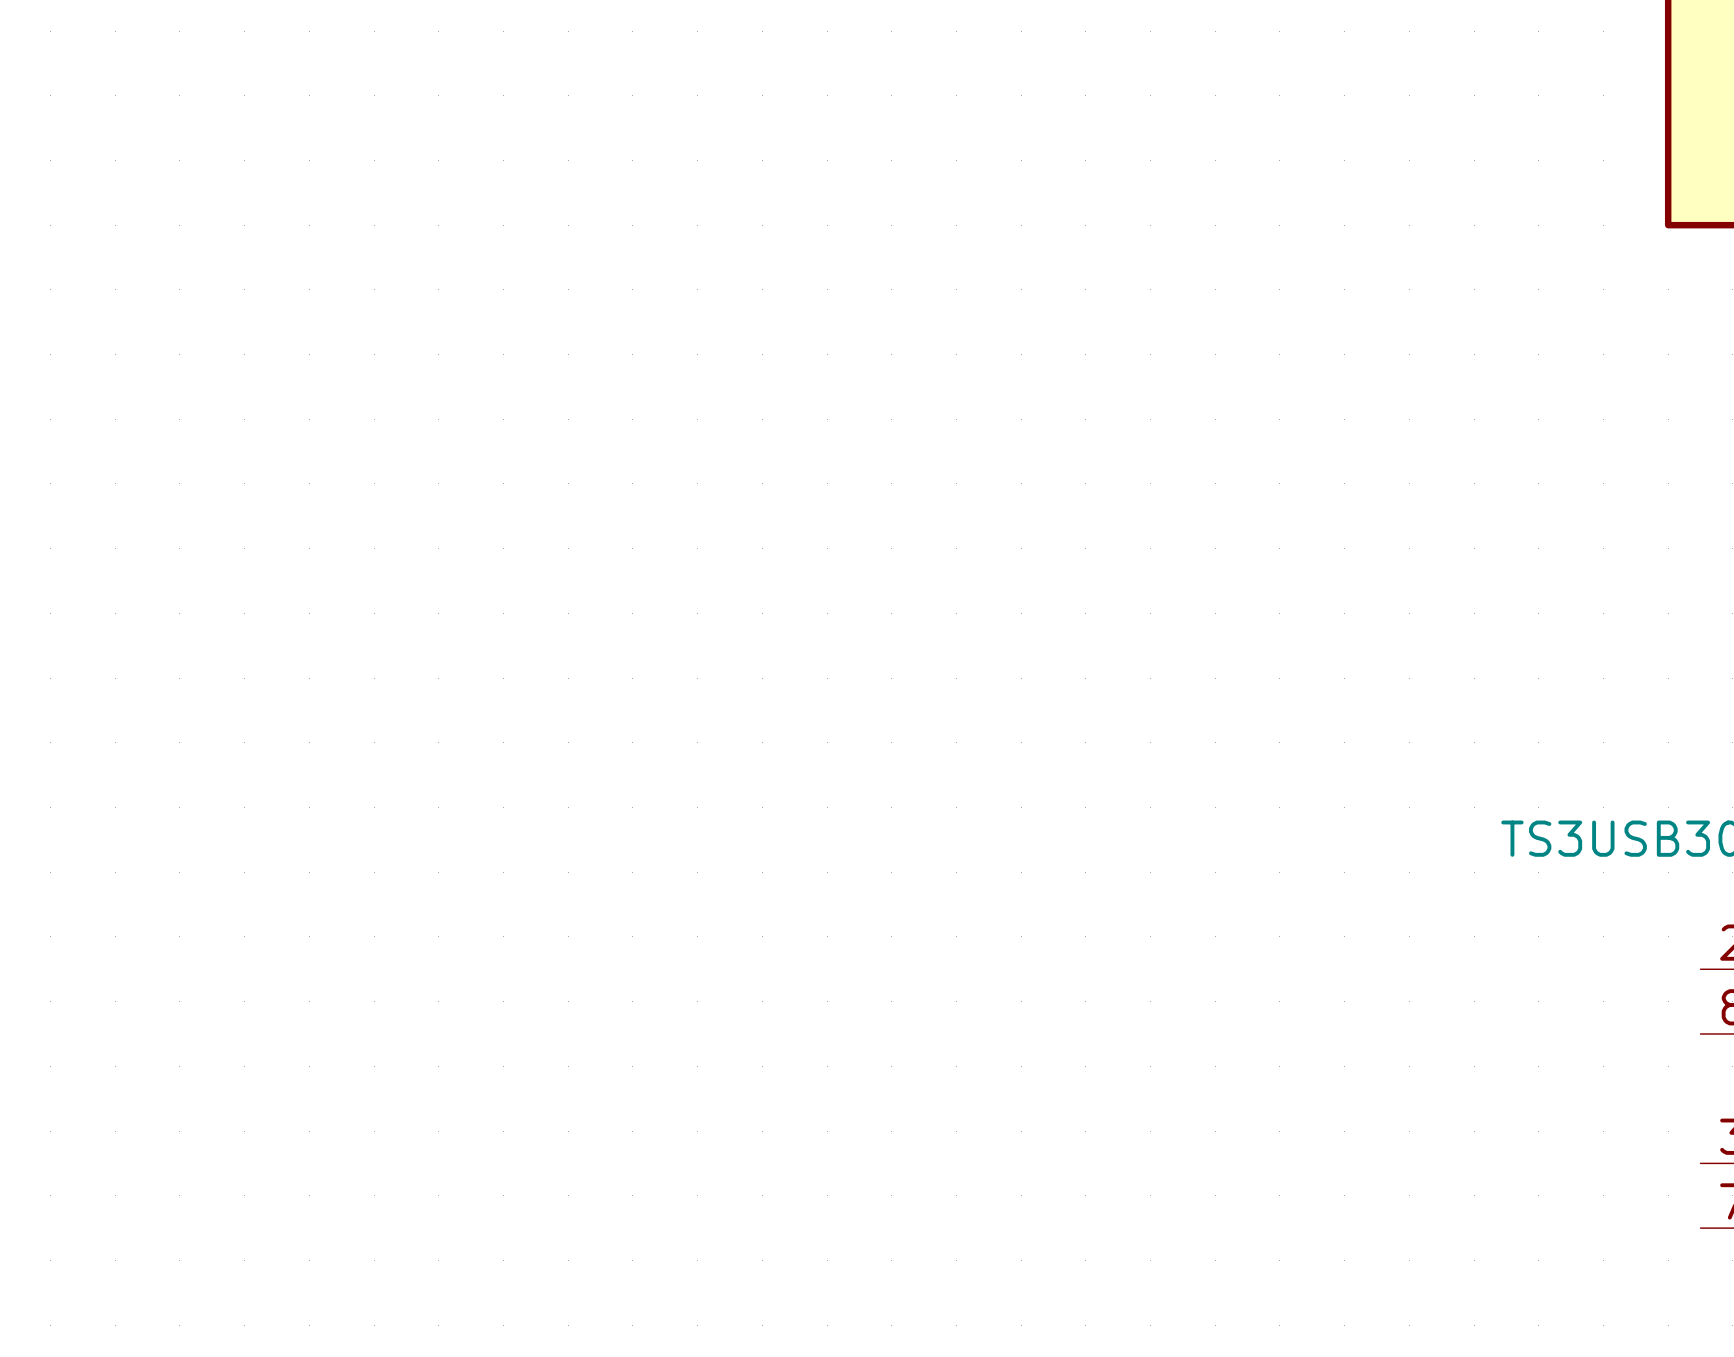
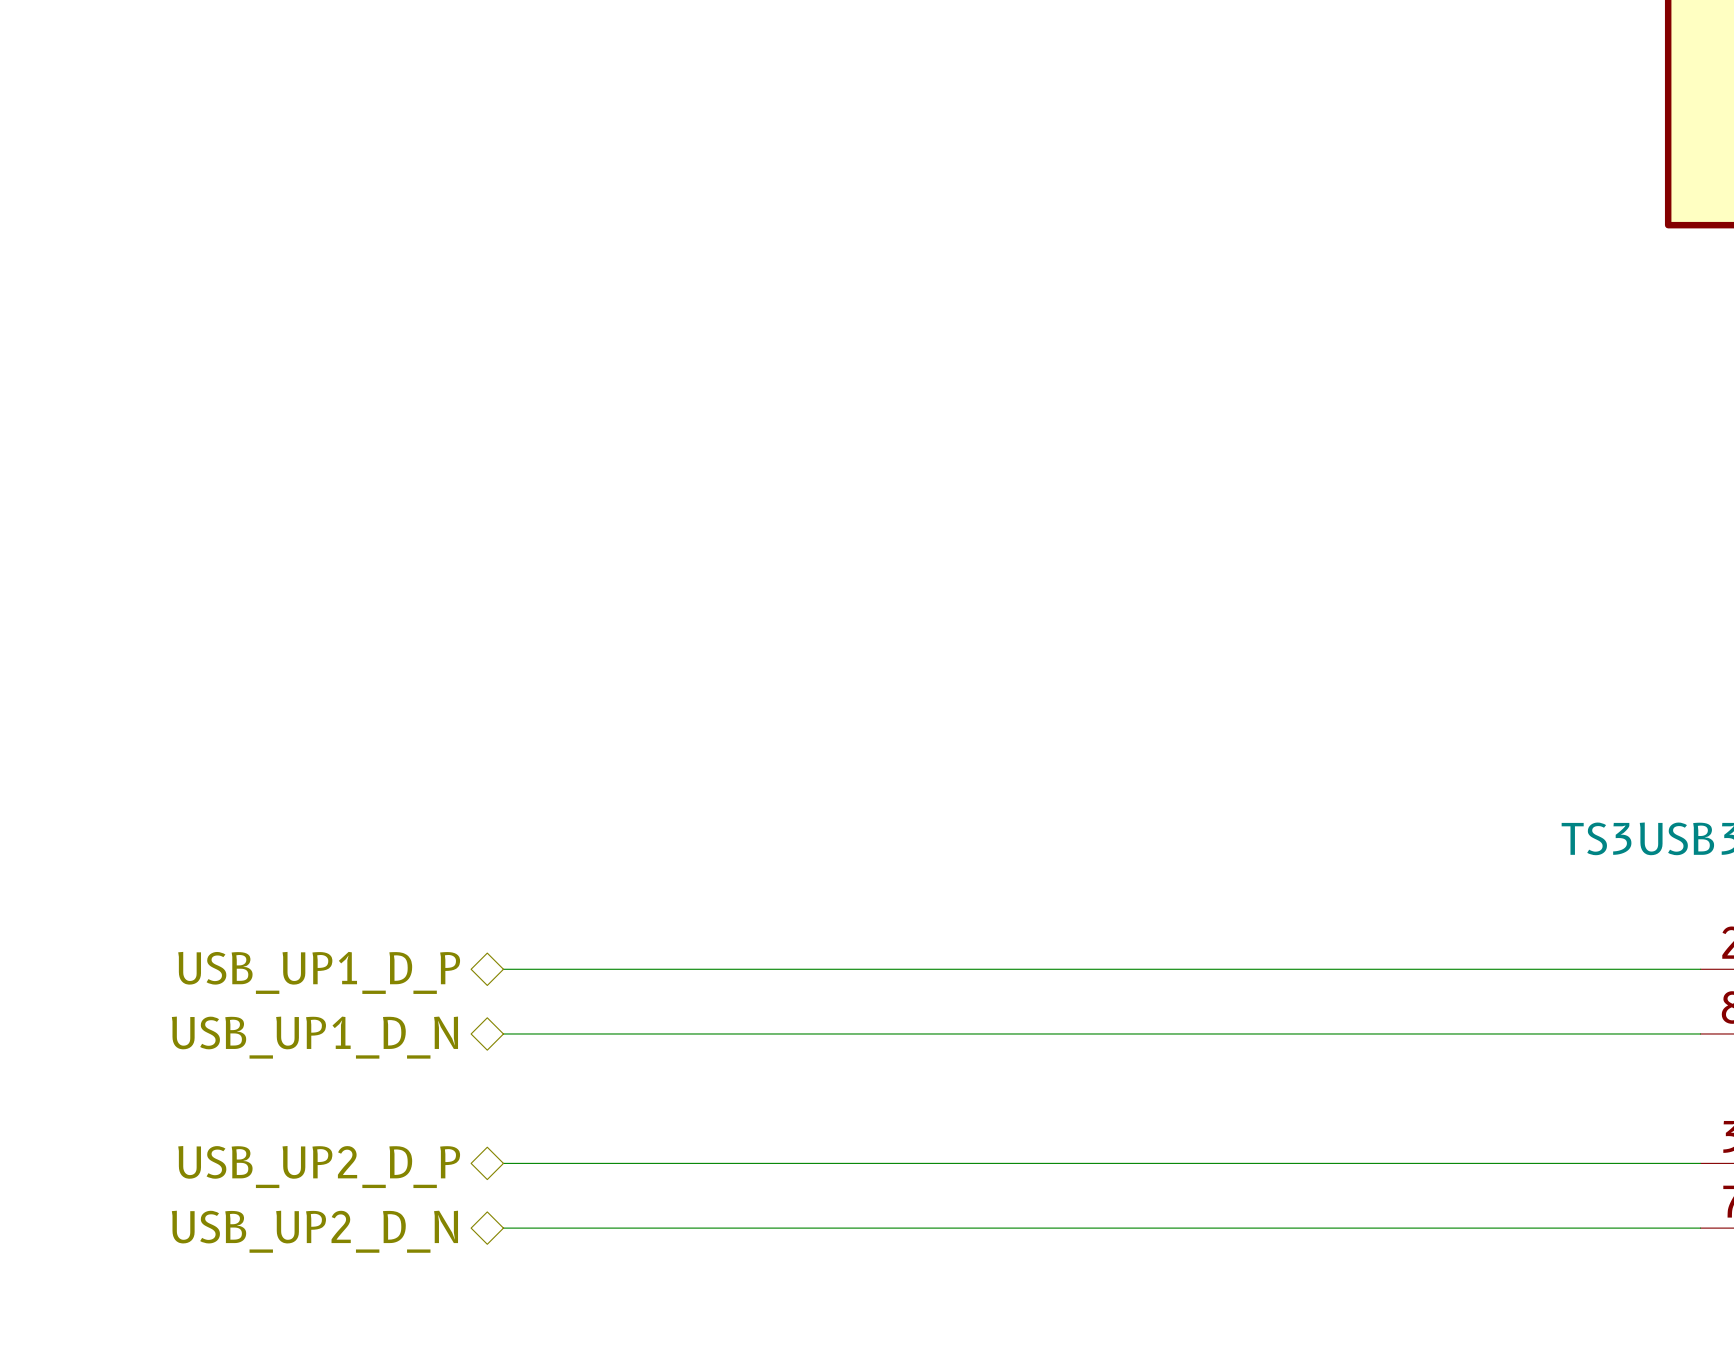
hierarchical label: none -> USB_UP1_D_P (319, 972)
wire: none -> (503, 969) (1700, 969)
wire: none -> (503, 1033) (1700, 1033)
hierarchical label: none -> USB_UP1_D_N (314, 1037)
hierarchical label: none -> USB_UP2_D_P (319, 1167)
wire: none -> (503, 1163) (1700, 1163)
hierarchical label: none -> USB_UP2_D_N (314, 1231)
wire: none -> (503, 1228) (1700, 1228)

